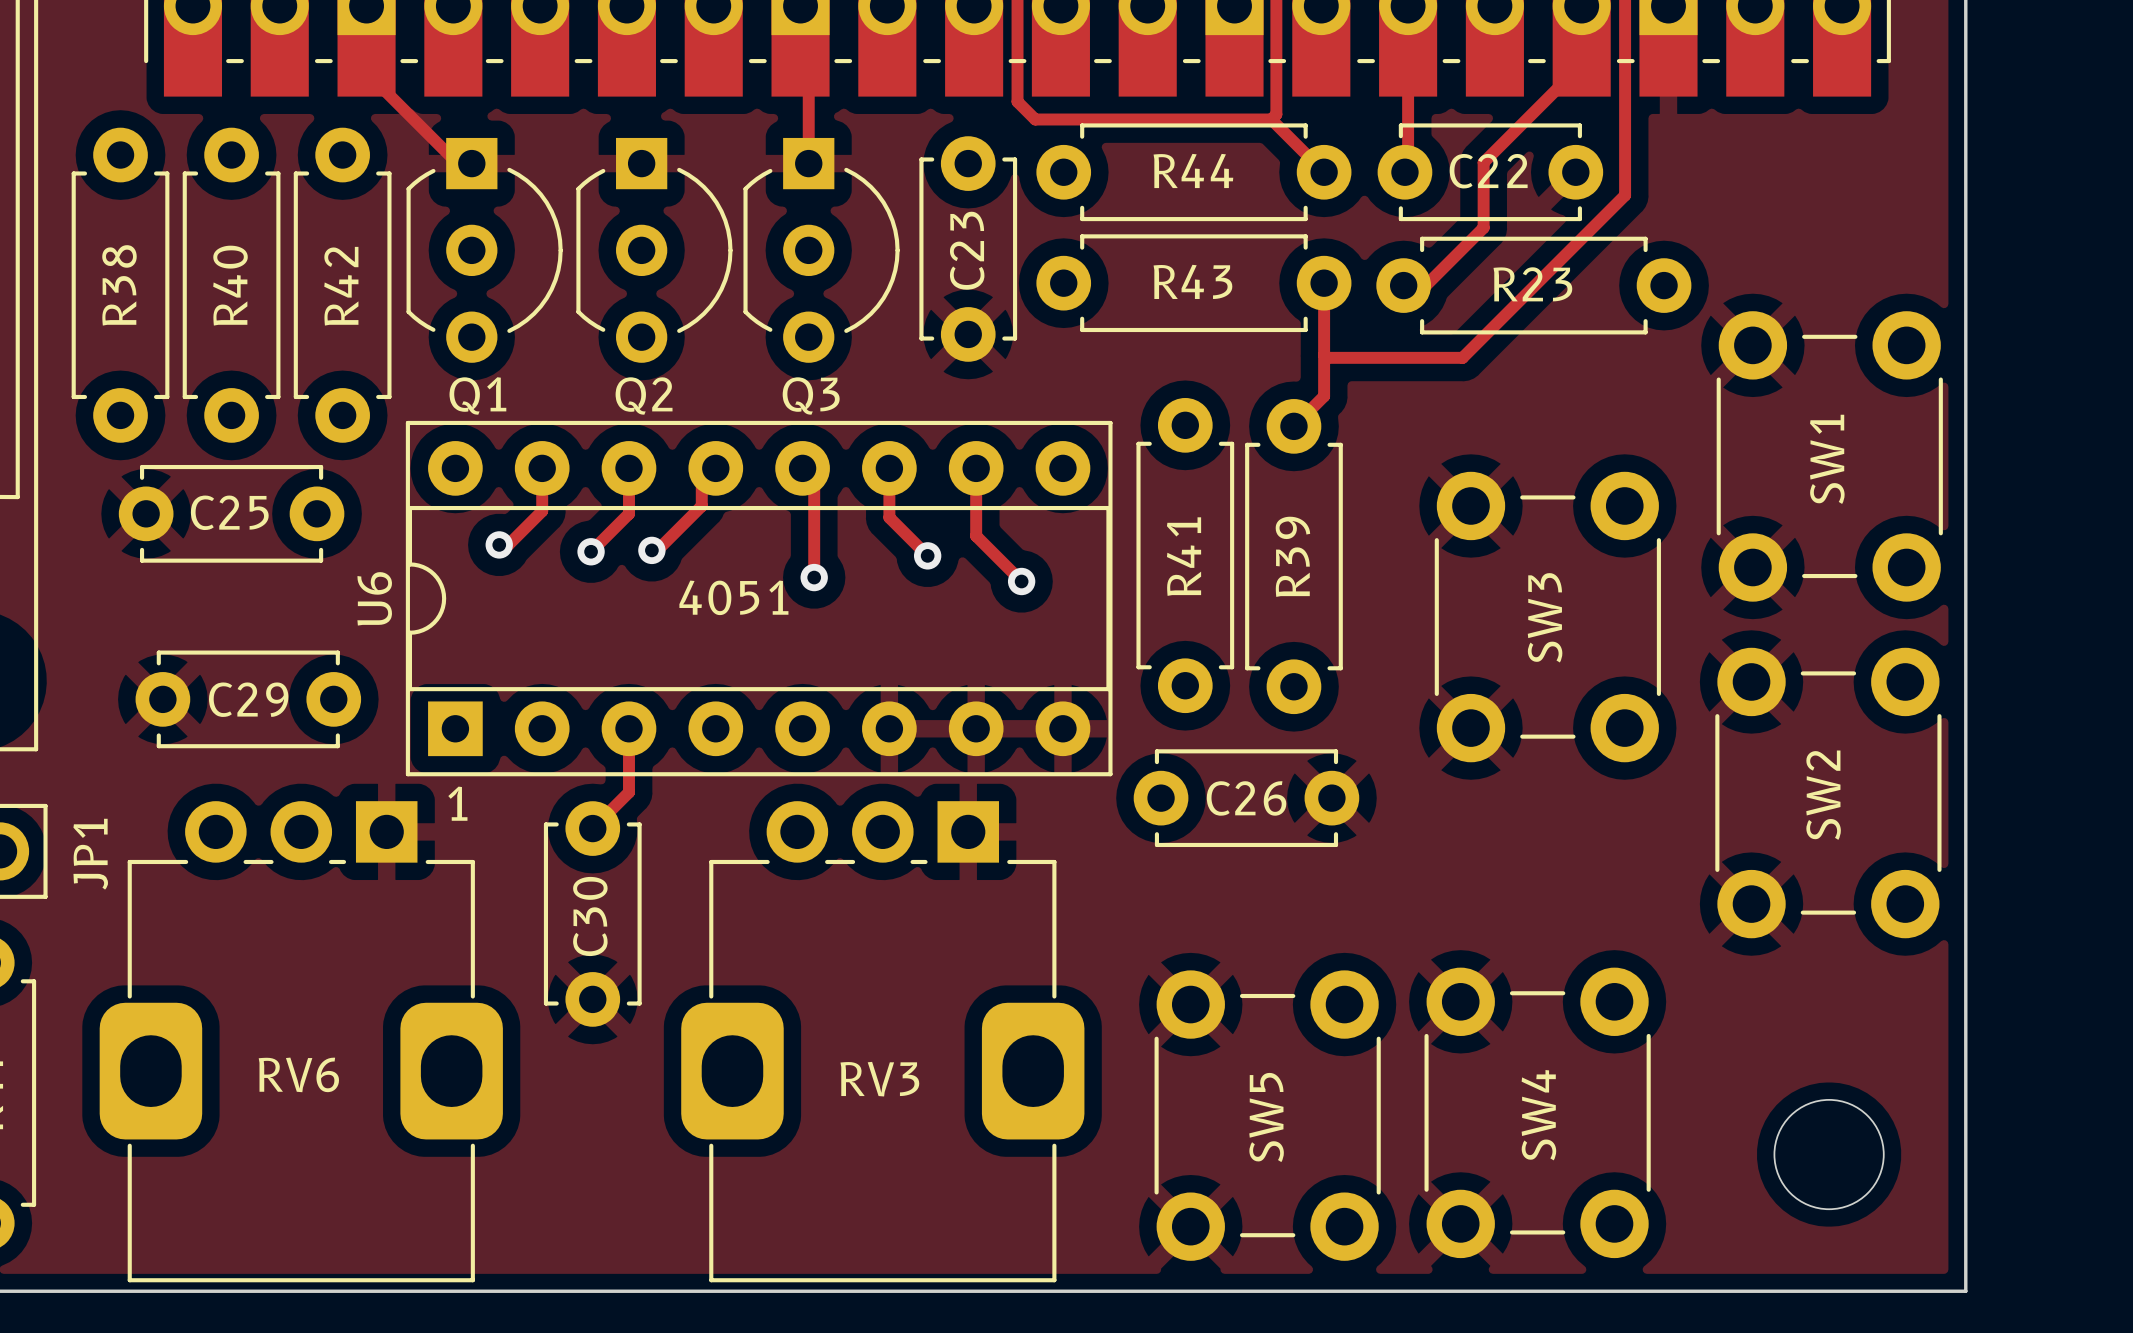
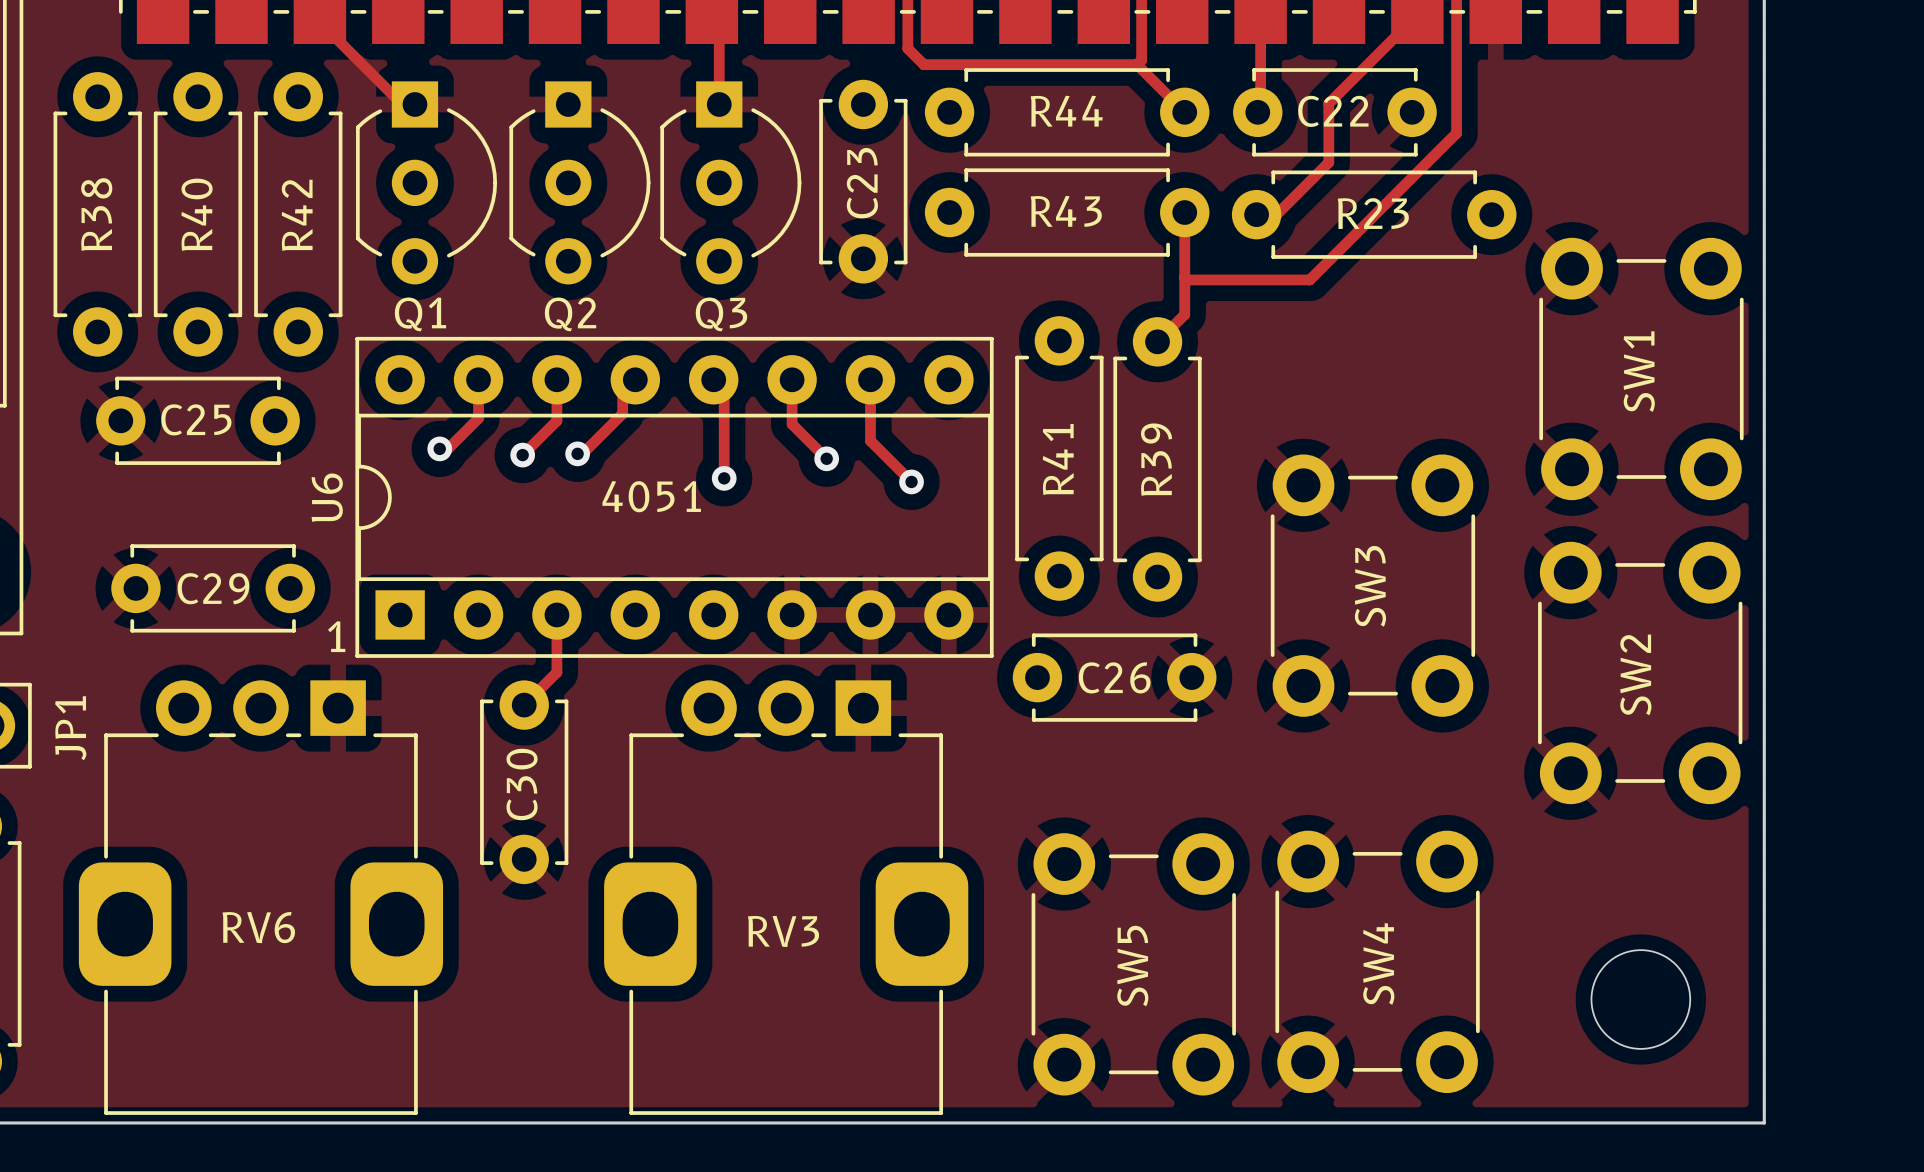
SW3 position: (1547, 617) -> (1372, 585)
text position: 1 (457, 803) -> 1 (336, 636)

